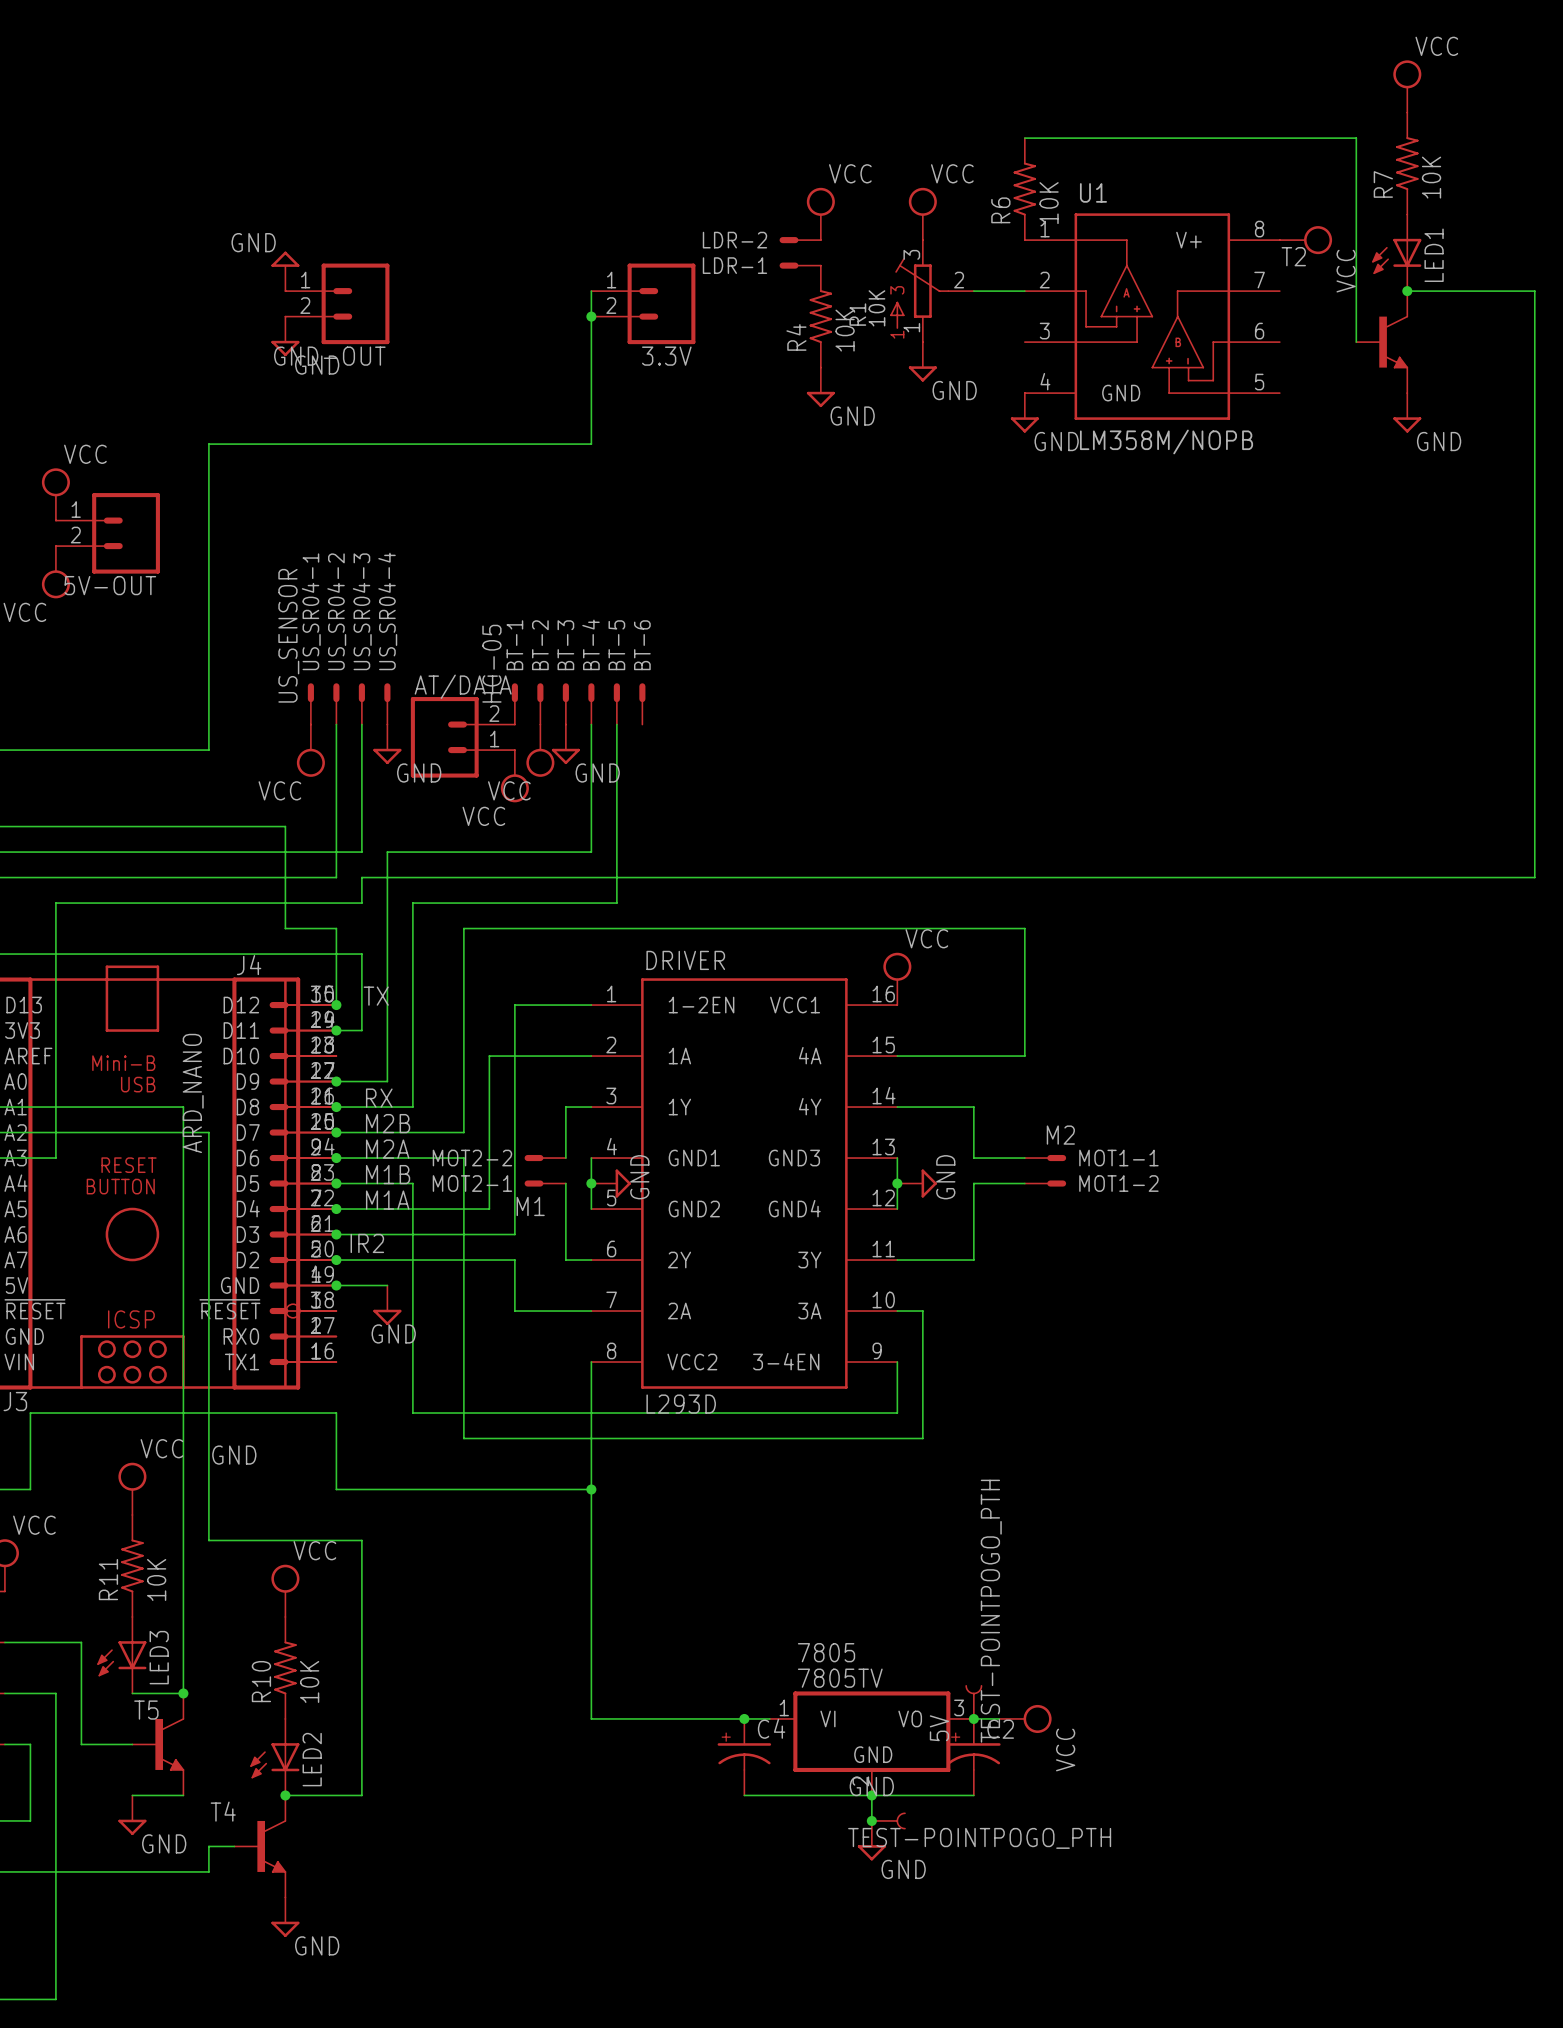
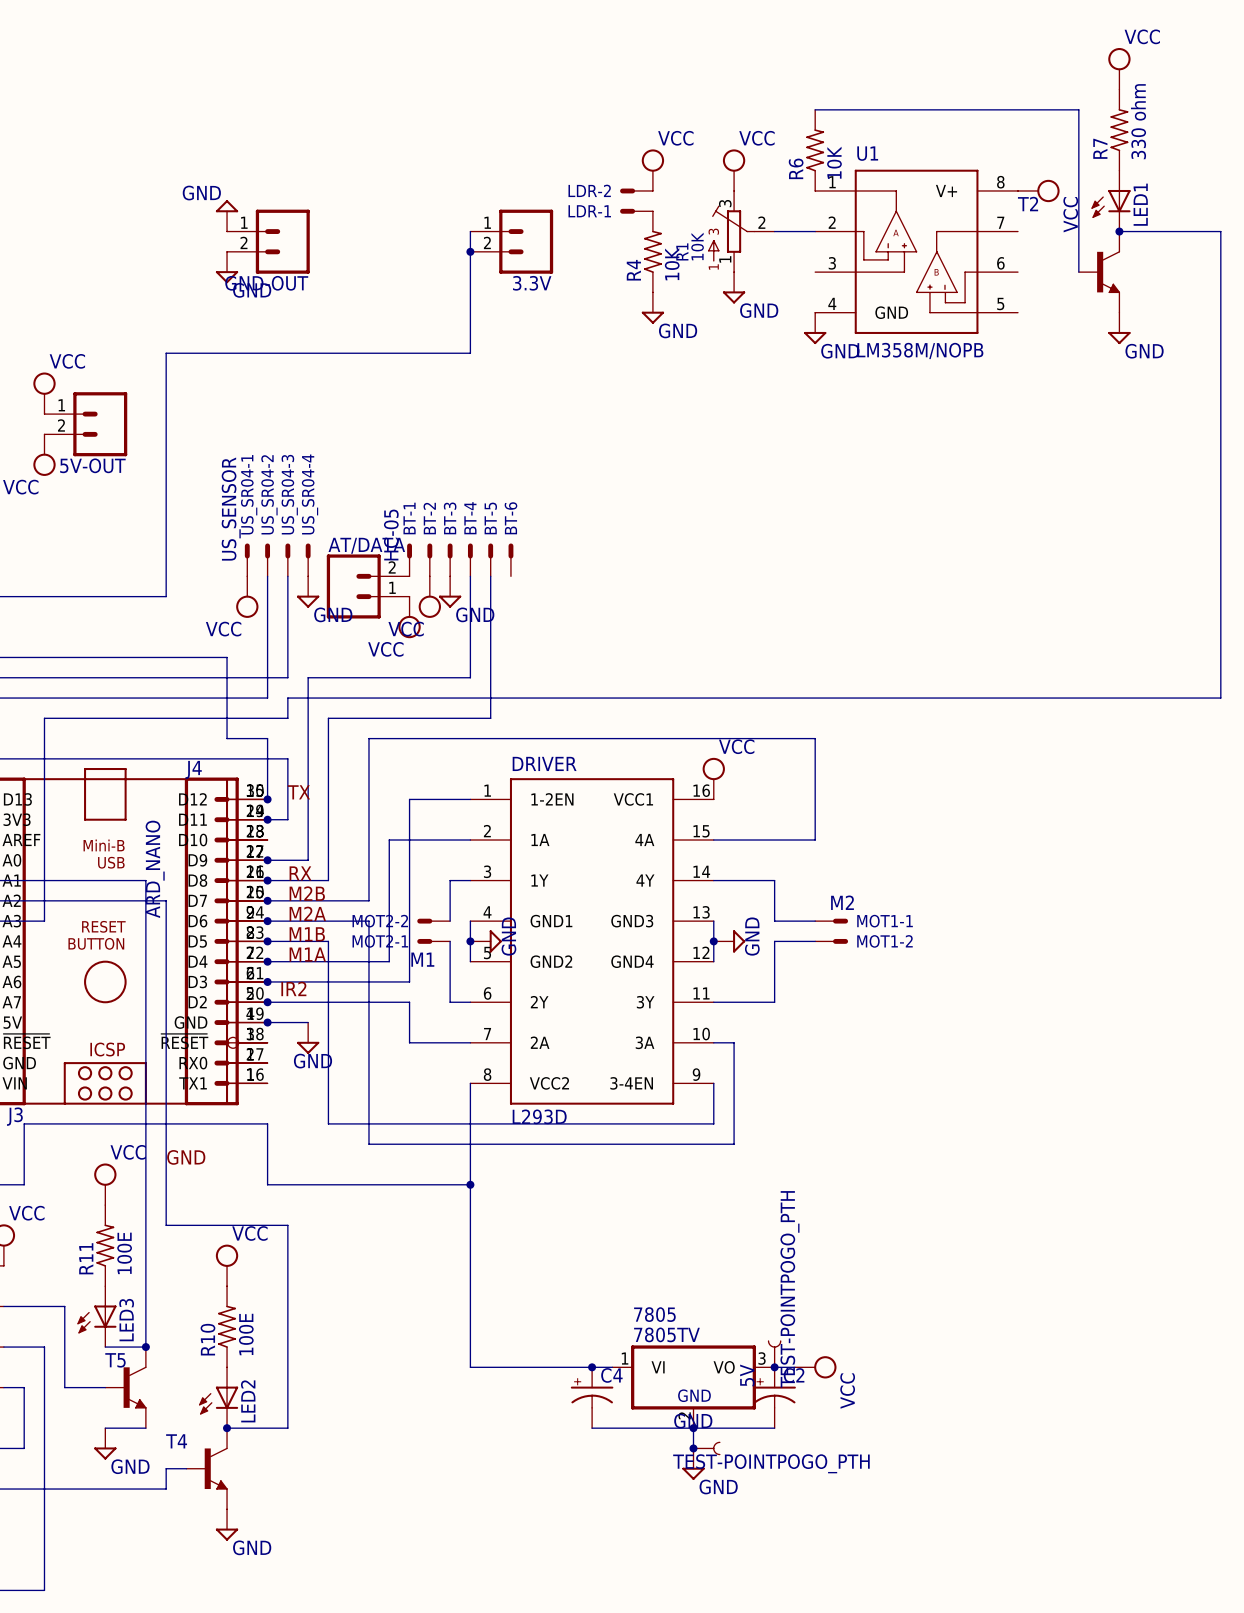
R7 value: 10K (1431, 177) -> 330 ohm (1138, 121)
R11 value: 10K (156, 1579) -> 100E (124, 1253)
R10 value: 10K (309, 1681) -> 100E (246, 1334)

